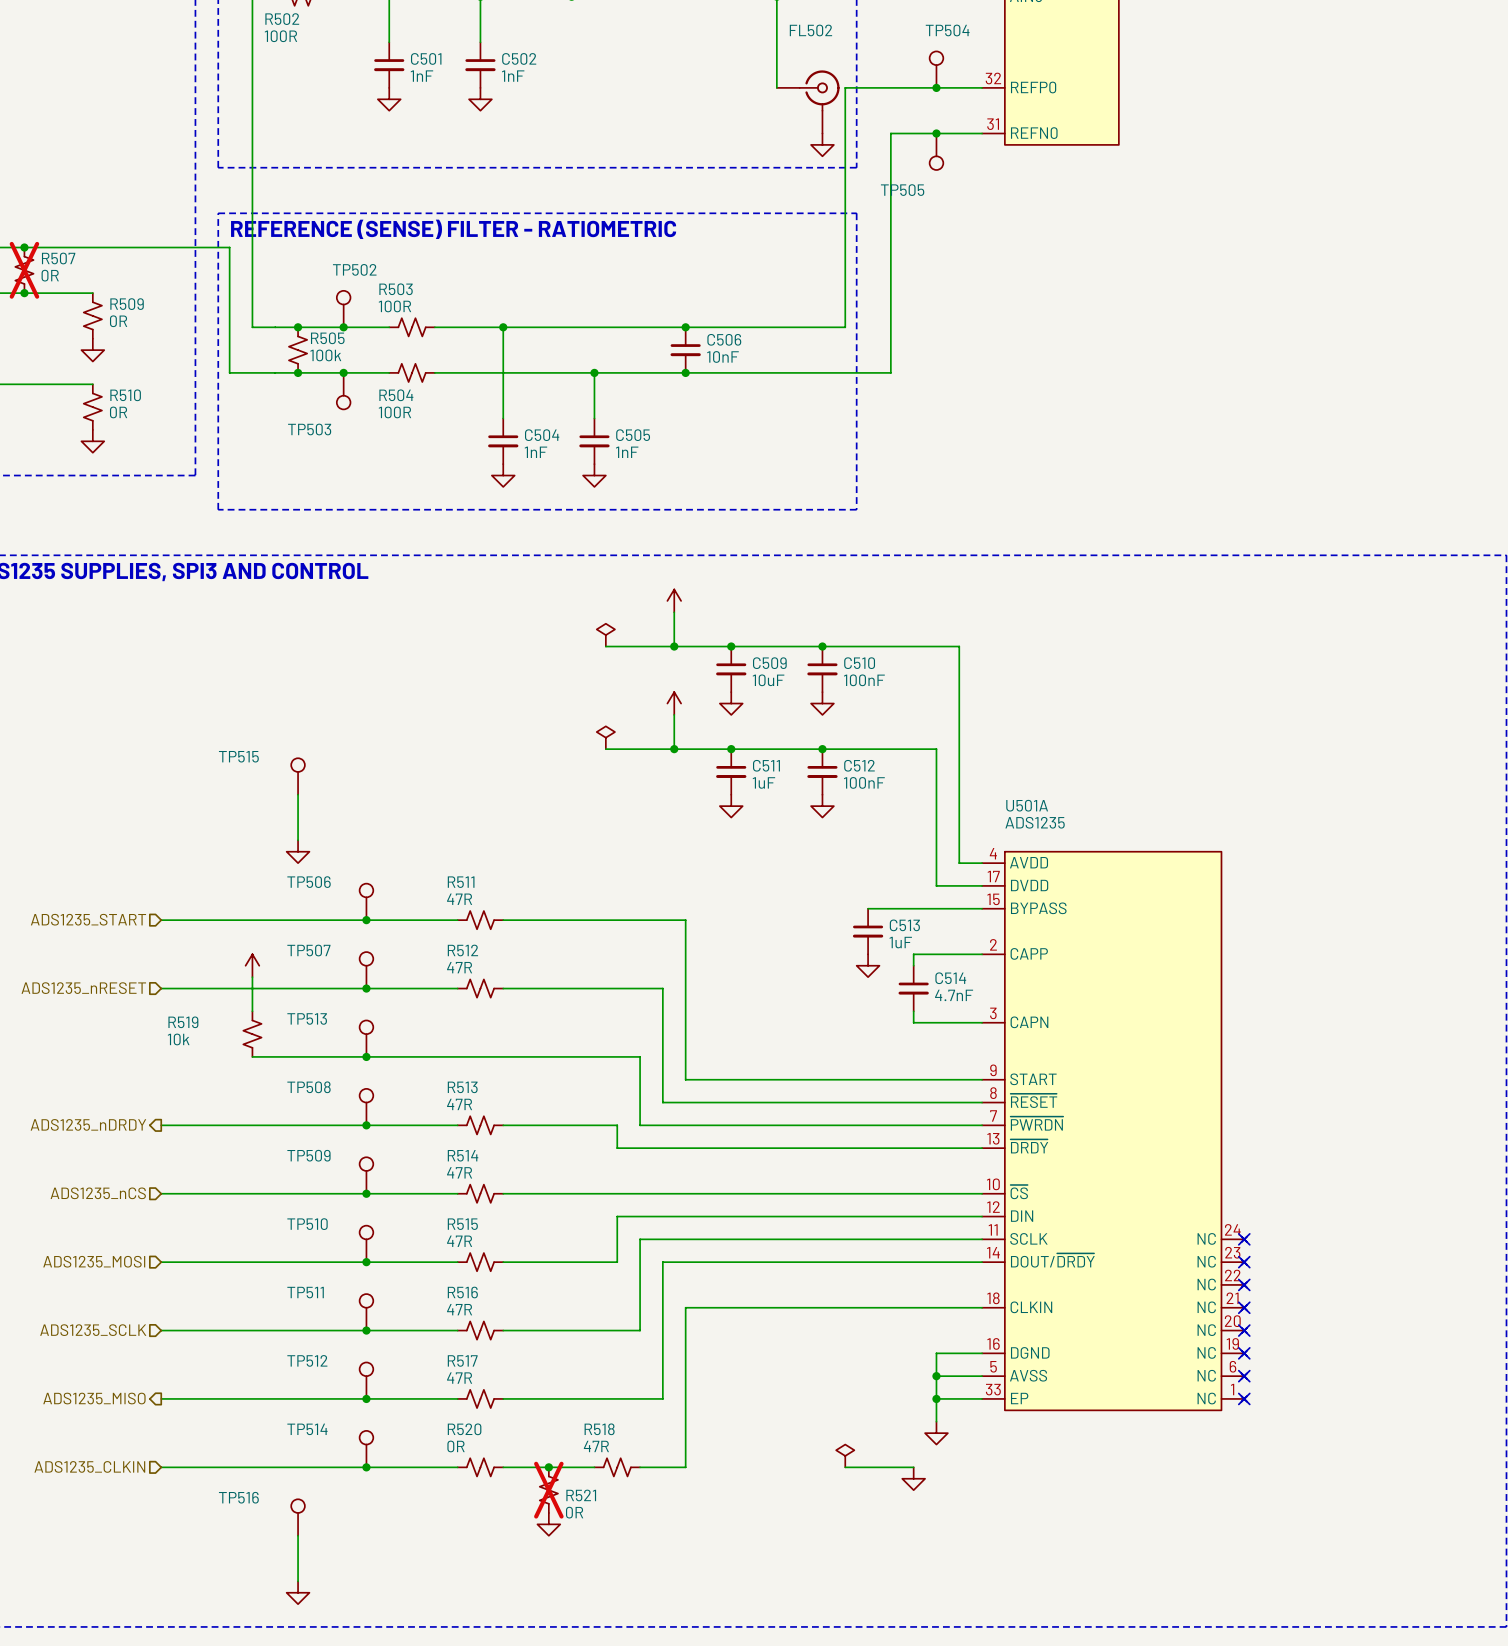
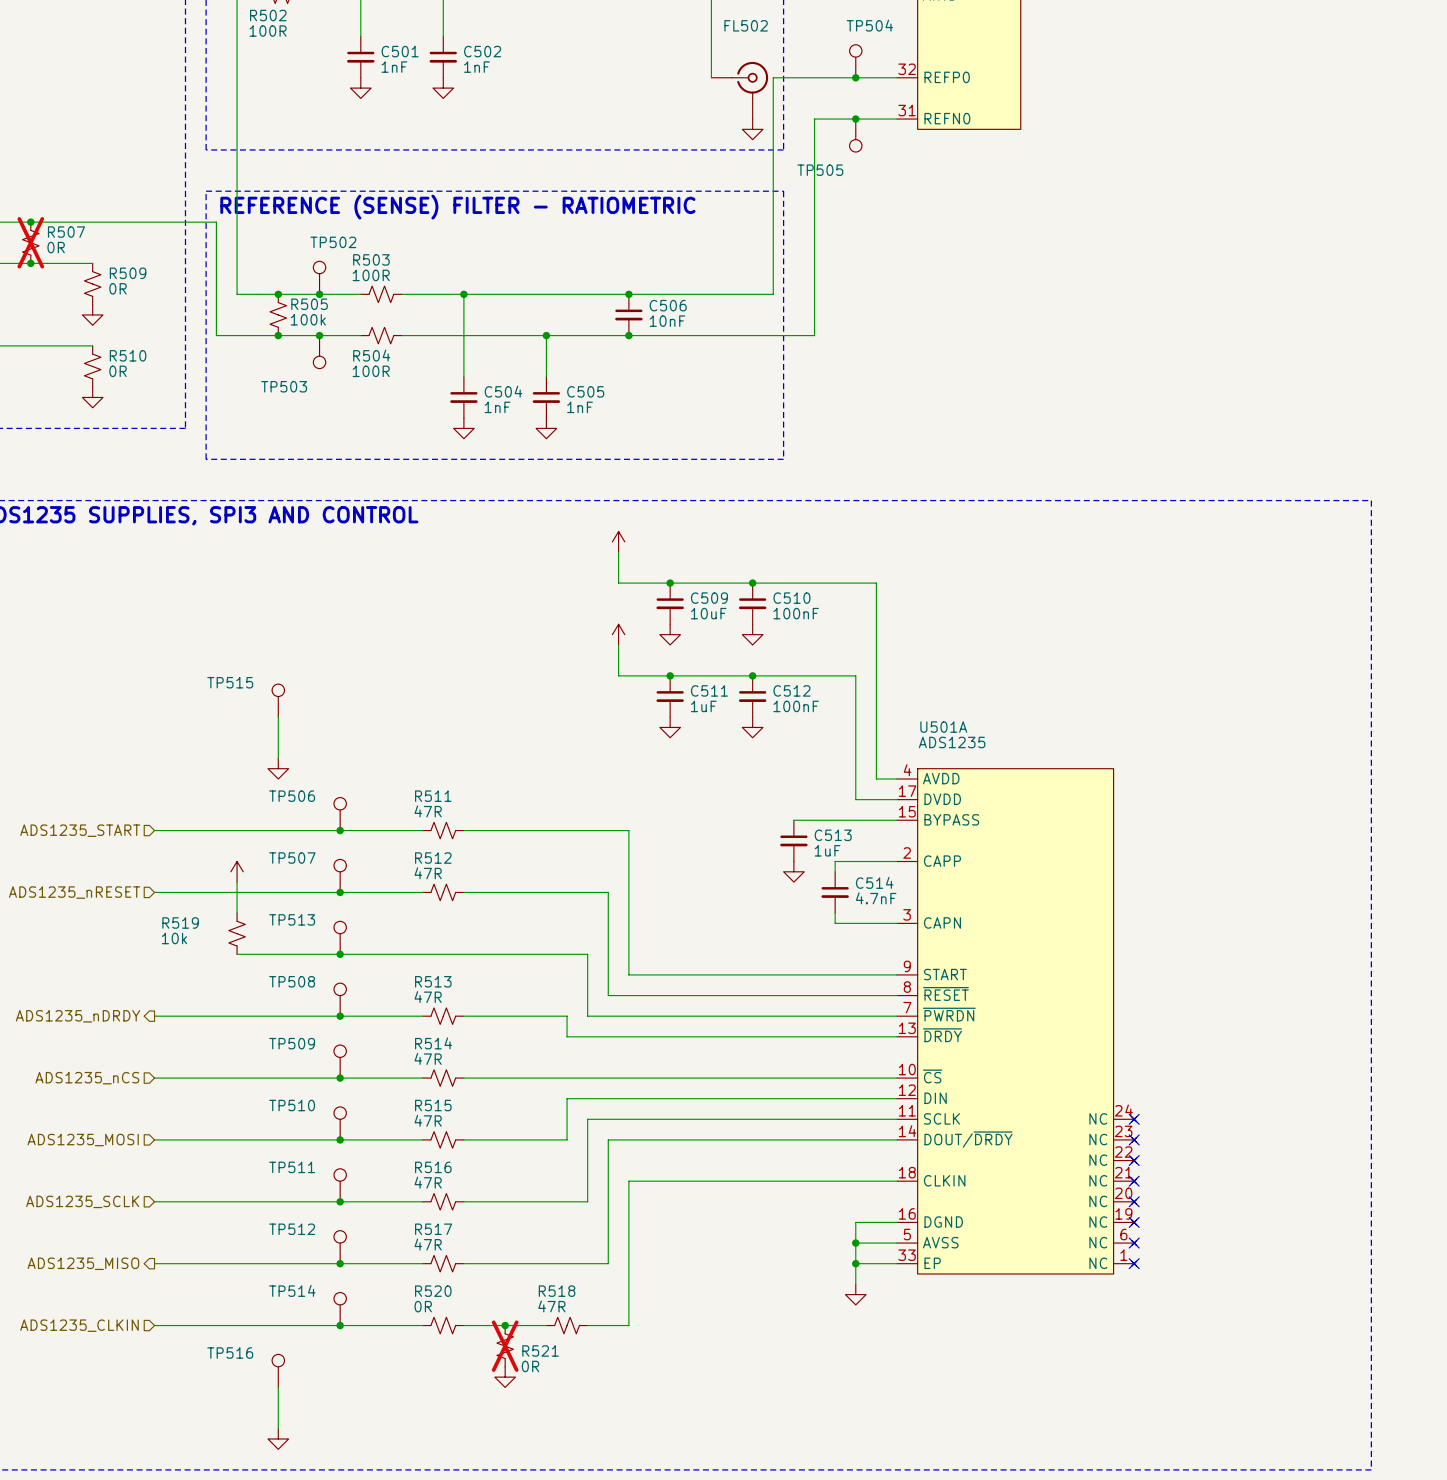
power symbol: (605, 635) -> none
wire: (605, 646) (674, 646) -> none
junction: (674, 646) -> none
power symbol: (605, 737) -> none
wire: (605, 749) (674, 749) -> none
junction: (674, 749) -> none
power symbol: (845, 1455) -> none
wire: (845, 1467) (913, 1467) -> none
power symbol: (913, 1478) -> none

